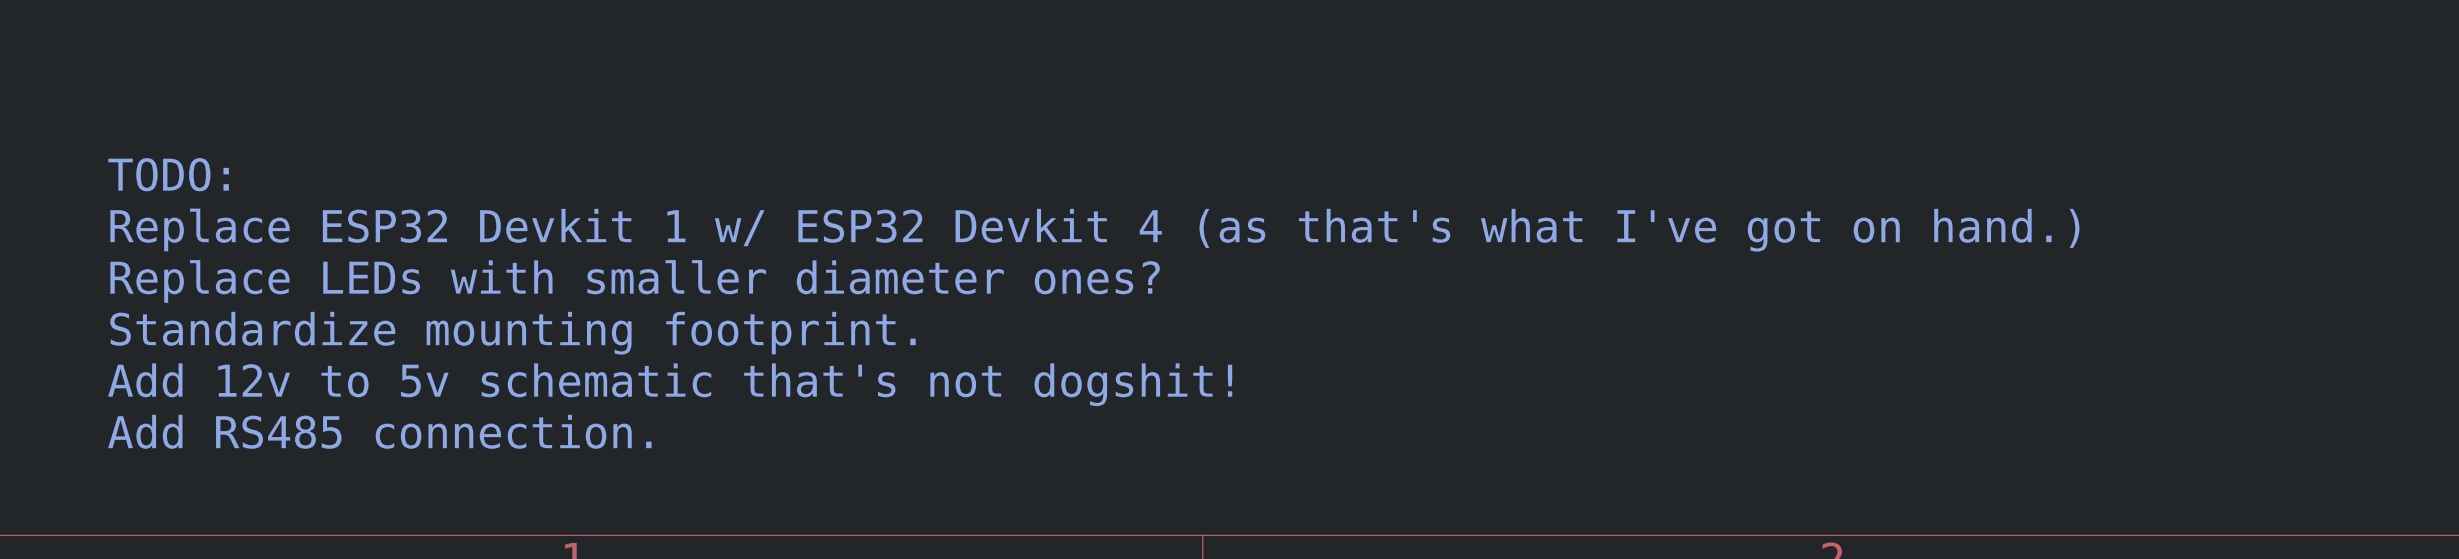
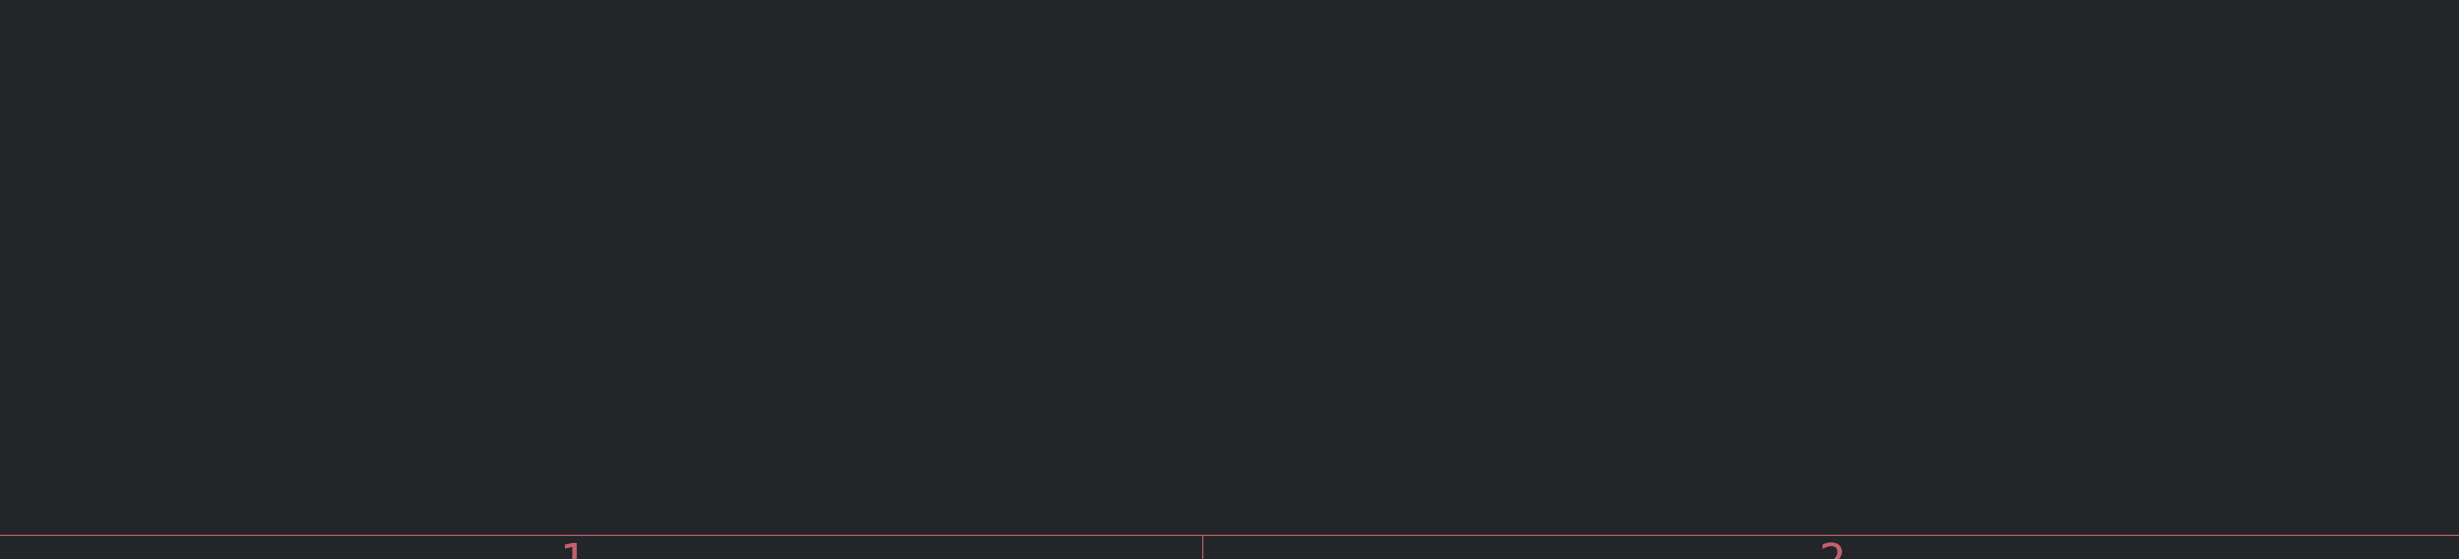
text: TODO: (168, 174) -> none
text: Replace ESP32 Devkit 1 w/ ESP32 Devkit 4 (as that's what I've got on hand.) (1094, 230) -> none
text: Replace LEDs with smaller diameter ones? (635, 281) -> none
text: Standardize mounting footprint. (513, 333) -> none
text: Add 12v to 5v schematic that's not dogshit! (670, 384) -> none
text: Add RS485 connection. (379, 431) -> none

